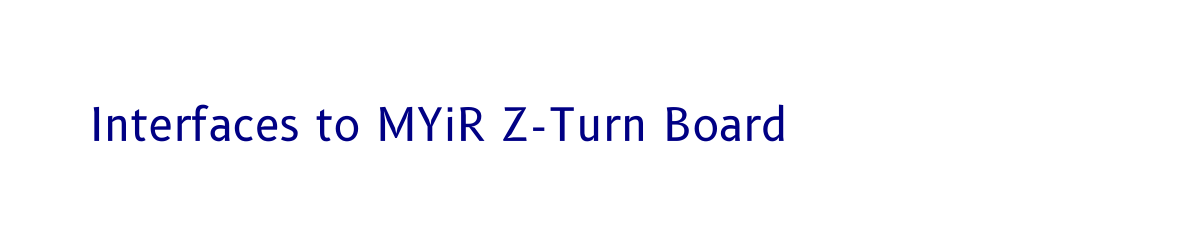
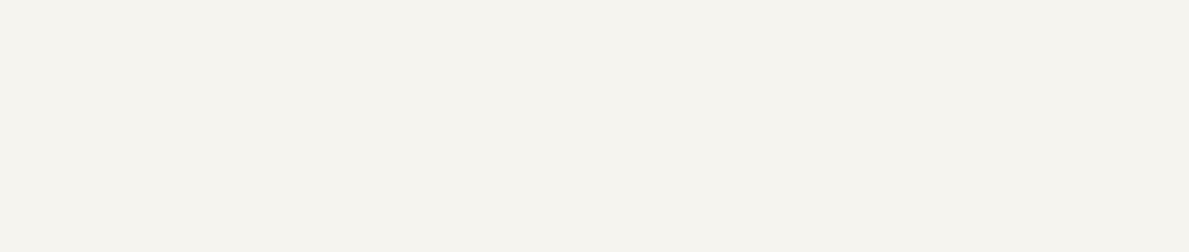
text: Interfaces to MYiR Z-Turn Board (438, 122) -> none

